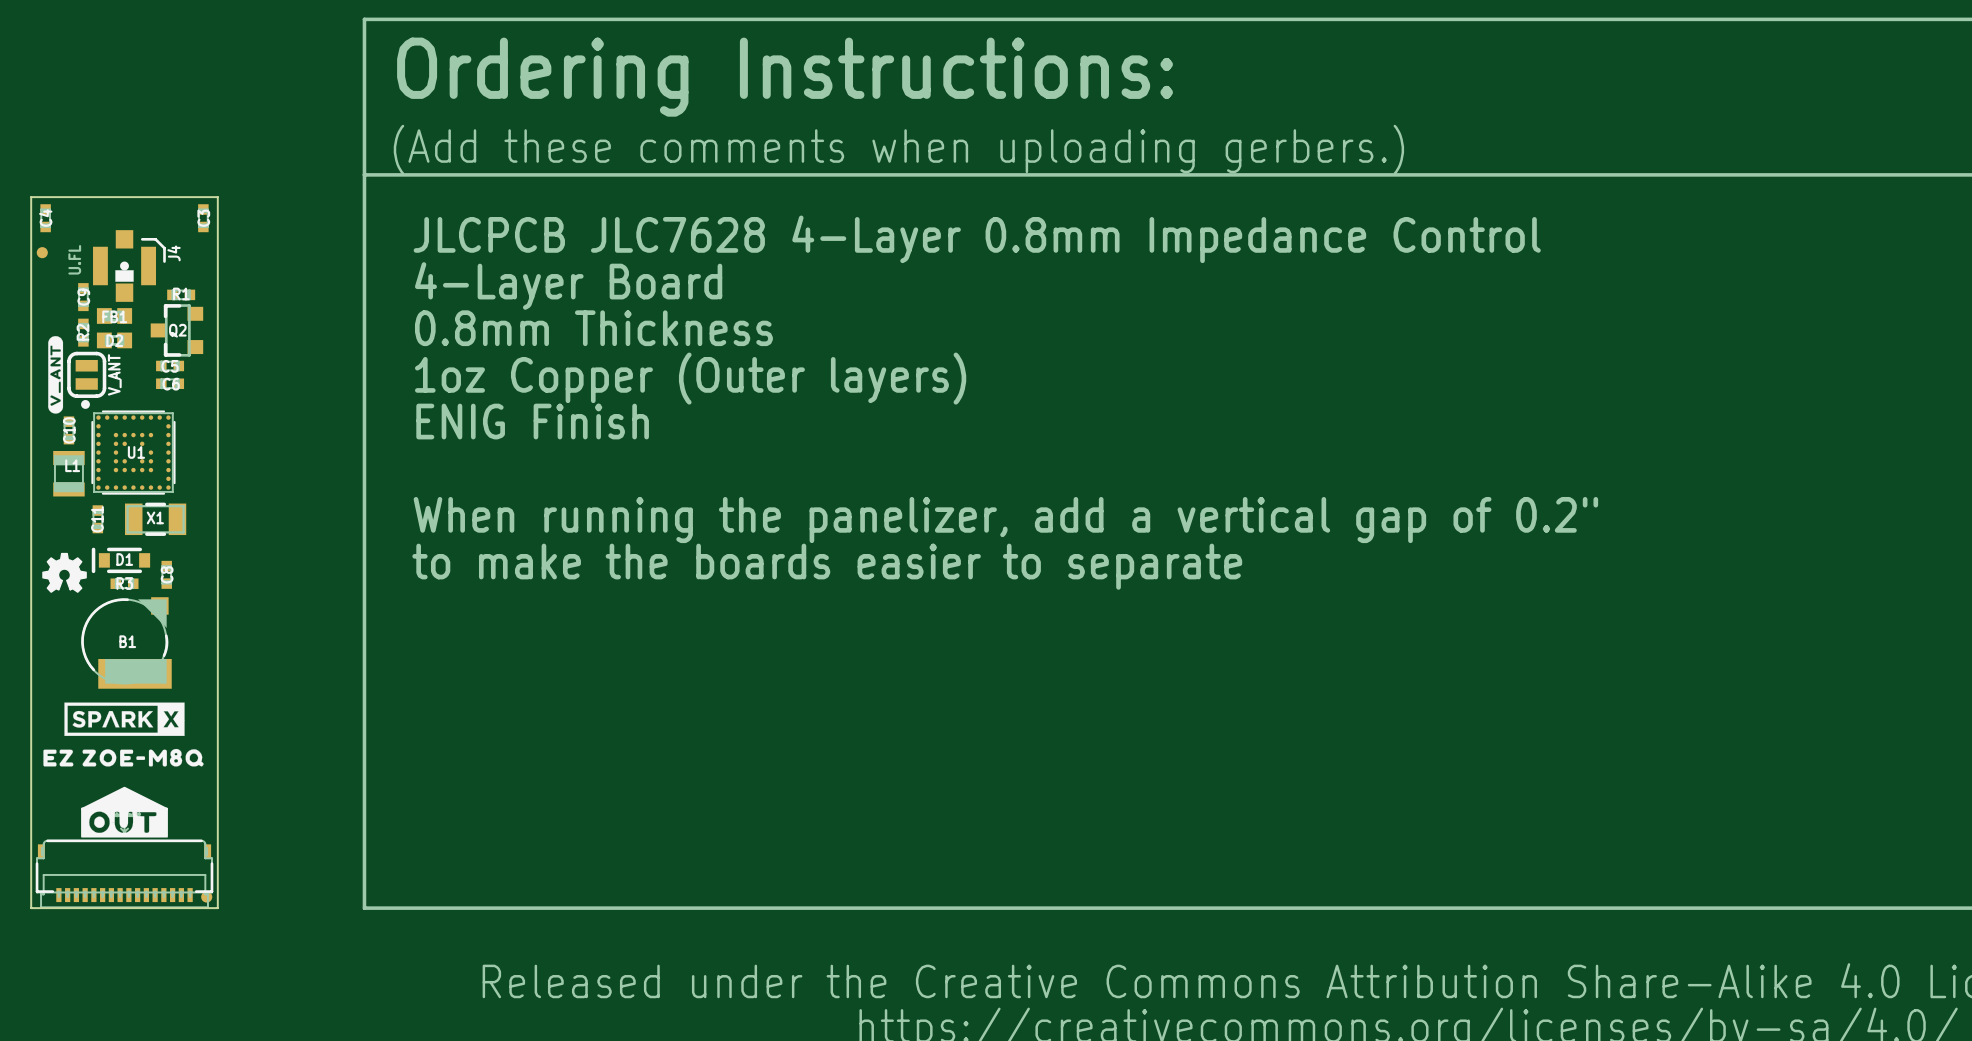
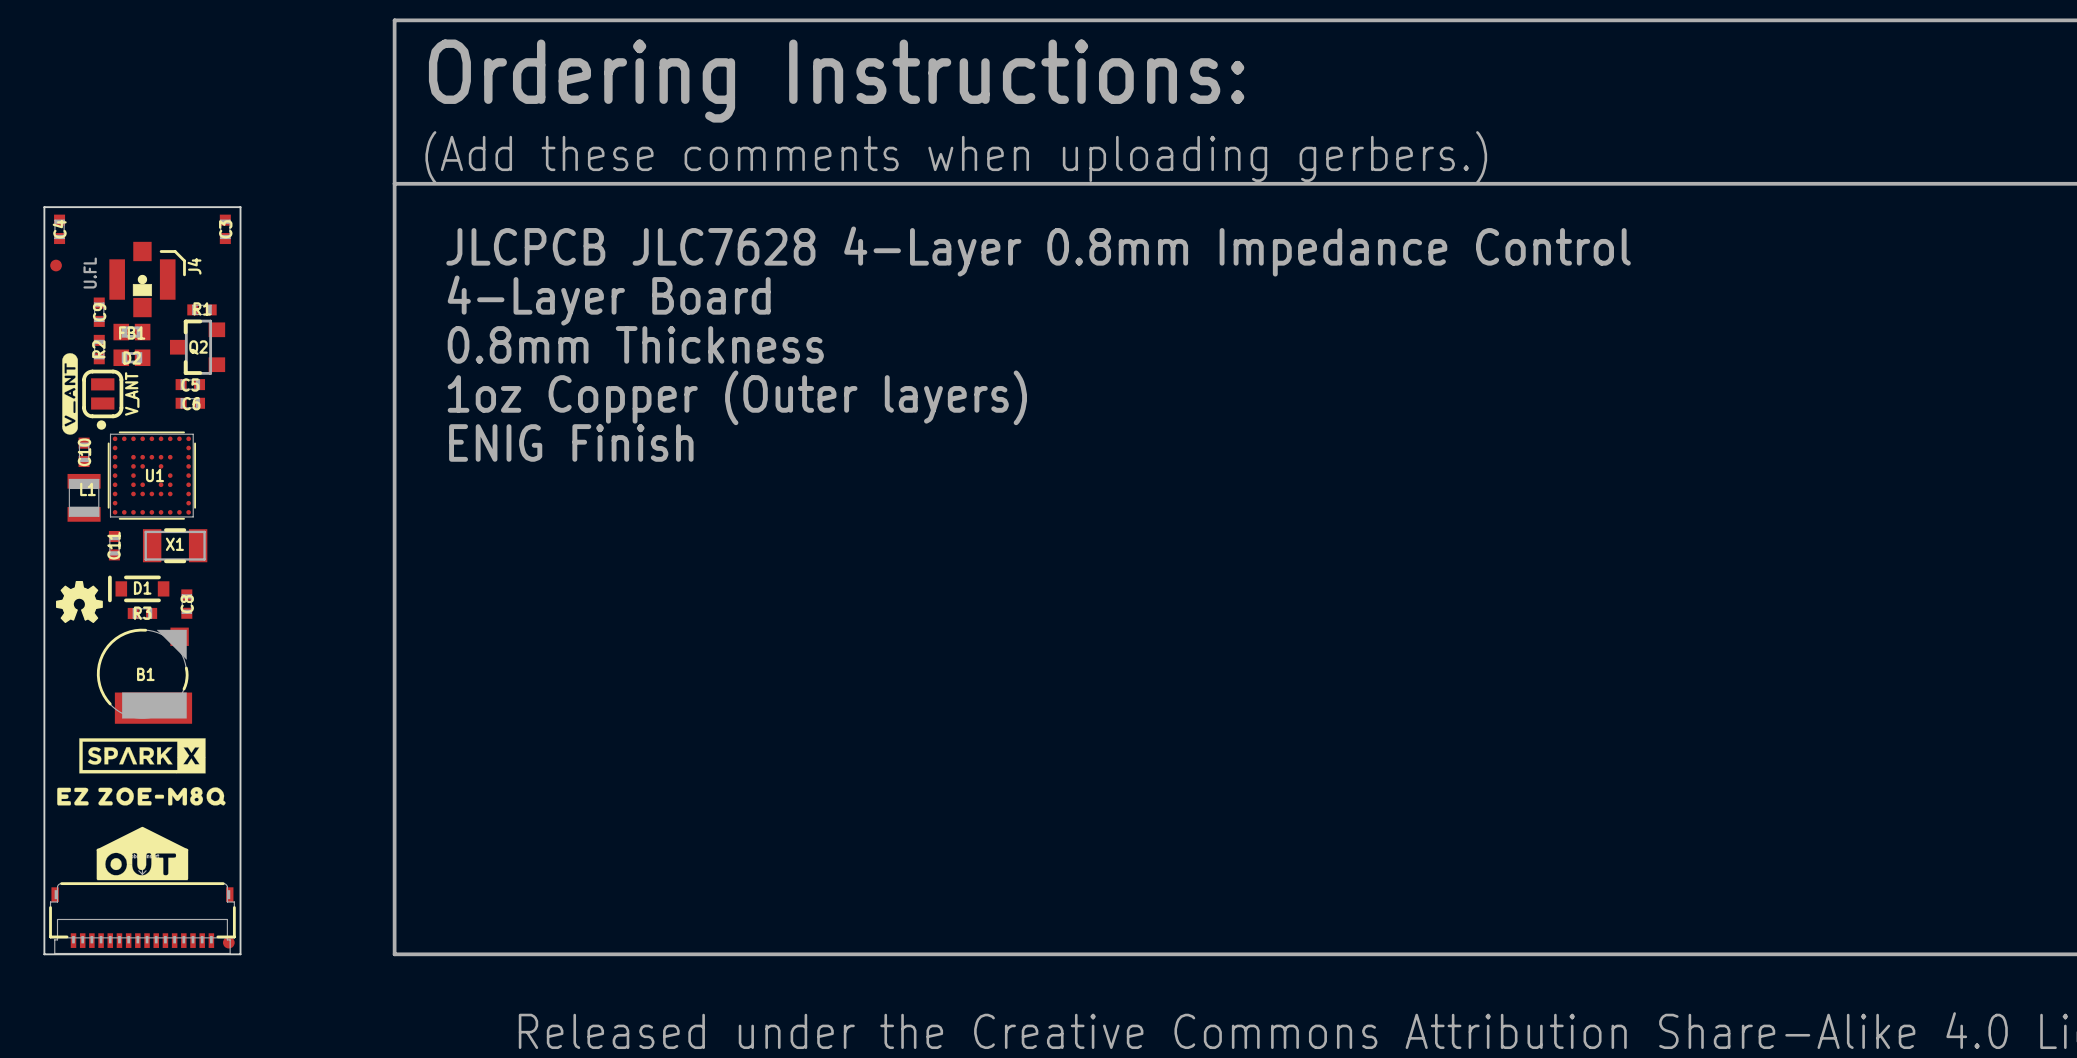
text: When running the panelizer, add a vertical gap of 0.2" (1005, 520) -> none
text: to make the boards easier to separate (827, 566) -> none

